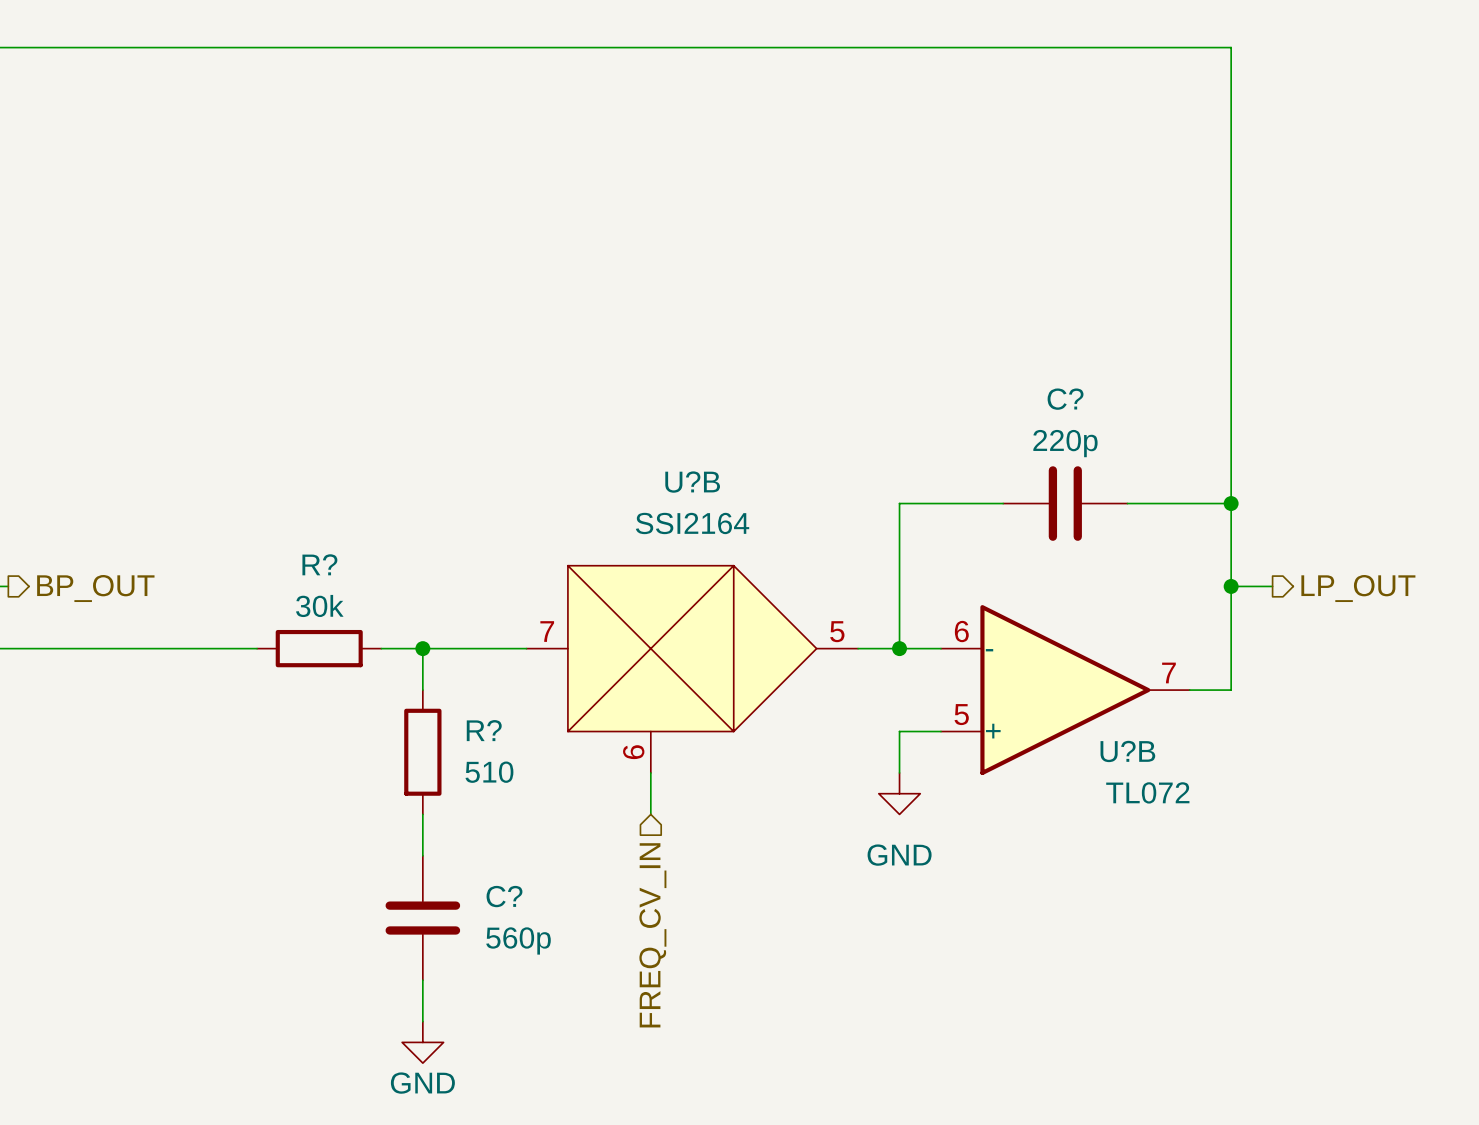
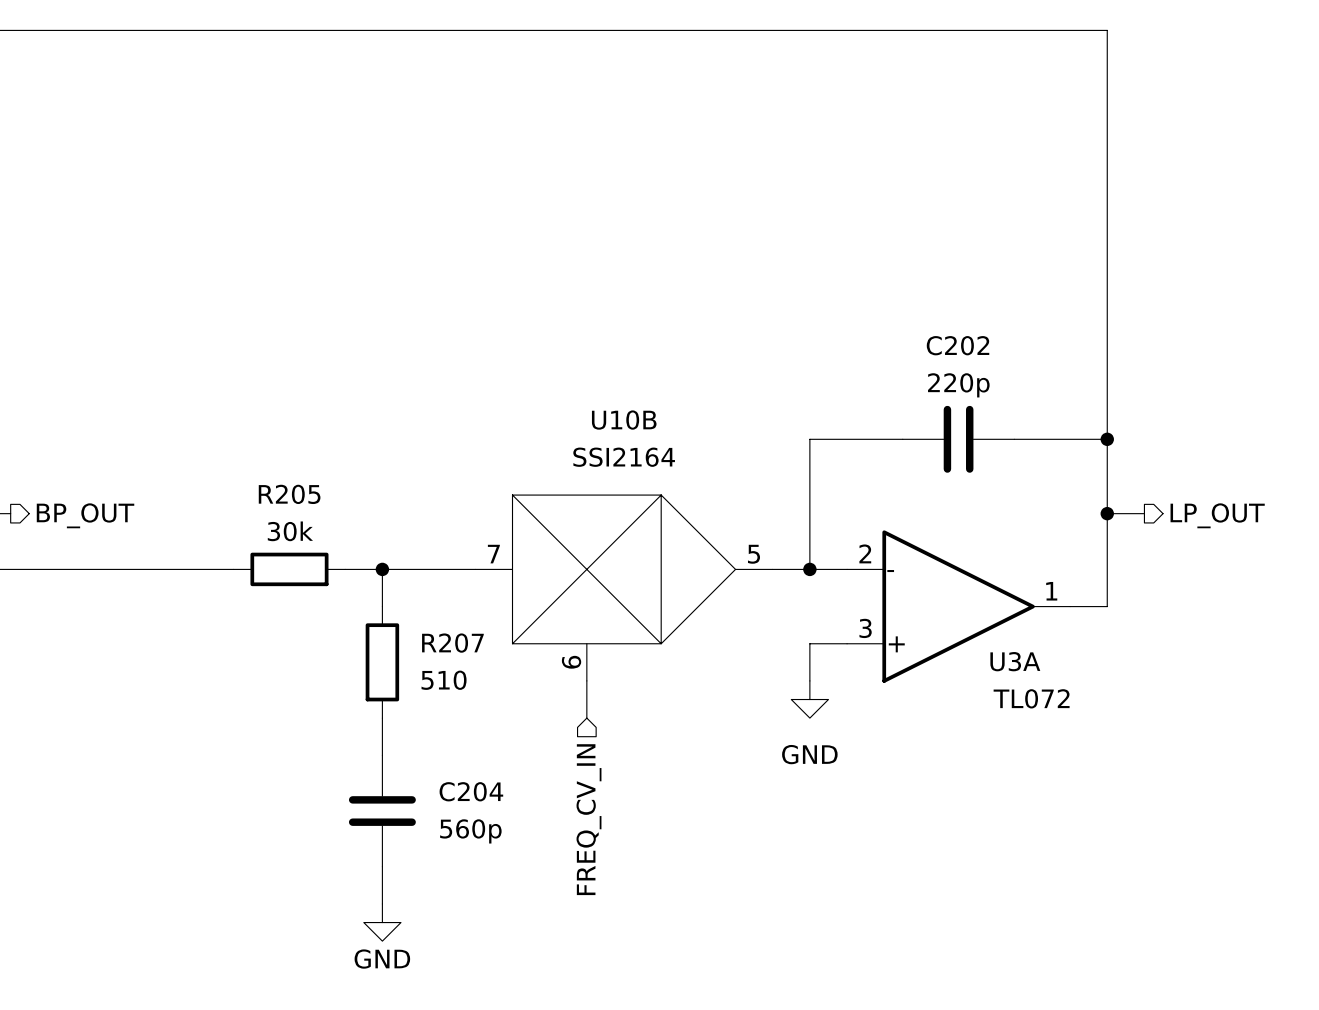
C? name: C? (1065, 399) -> C202 (958, 345)
U?B name: U?B (692, 482) -> U10B (624, 420)
R? name: R? (319, 564) -> R205 (289, 494)
U?B pin number: 6 (961, 631) -> 2 (865, 553)
U?B pin number: 7 (1168, 672) -> 1 (1051, 591)
U?B pin number: 5 (961, 714) -> 3 (865, 628)
R? name: R? (484, 730) -> R207 (452, 643)
U?B name: U?B (1127, 751) -> U3A (1015, 661)
C? name: C? (504, 896) -> C204 (471, 791)

